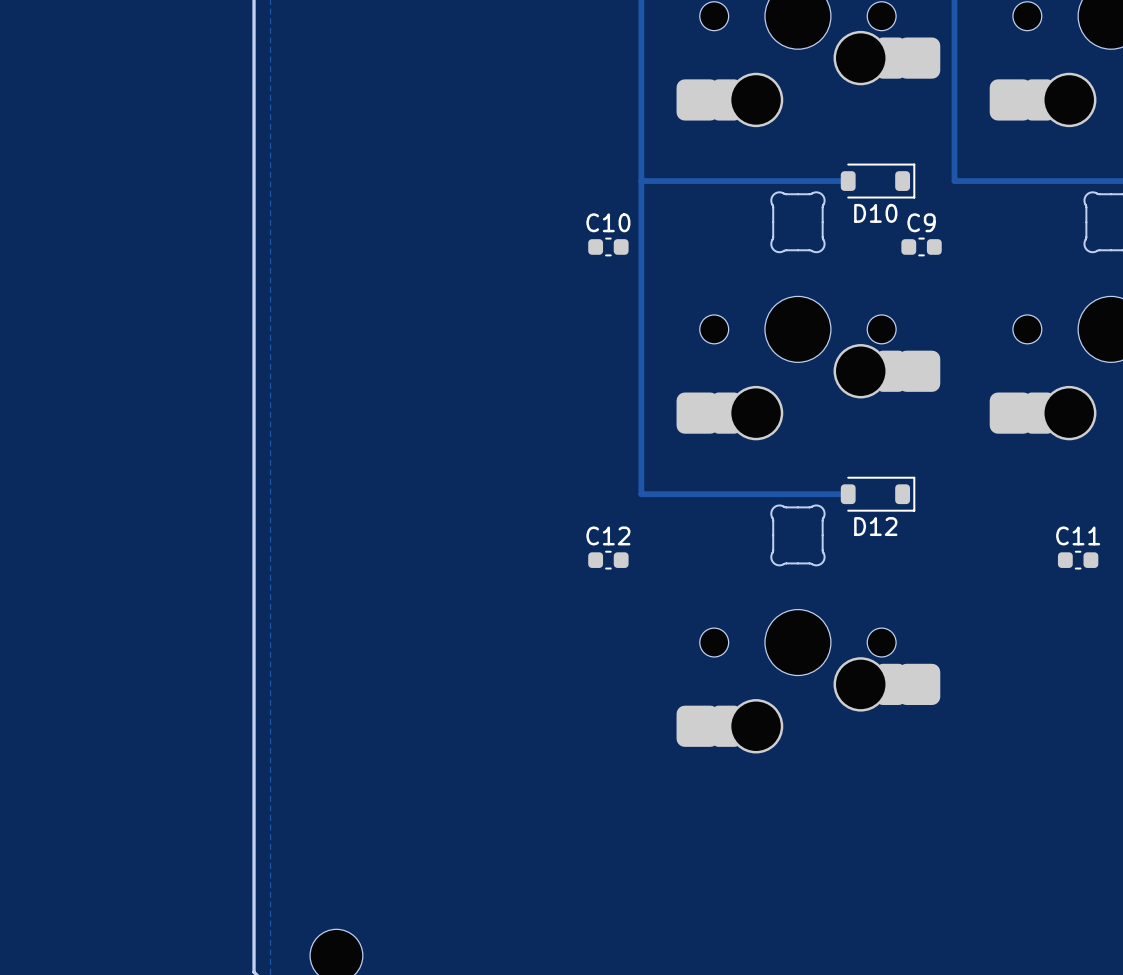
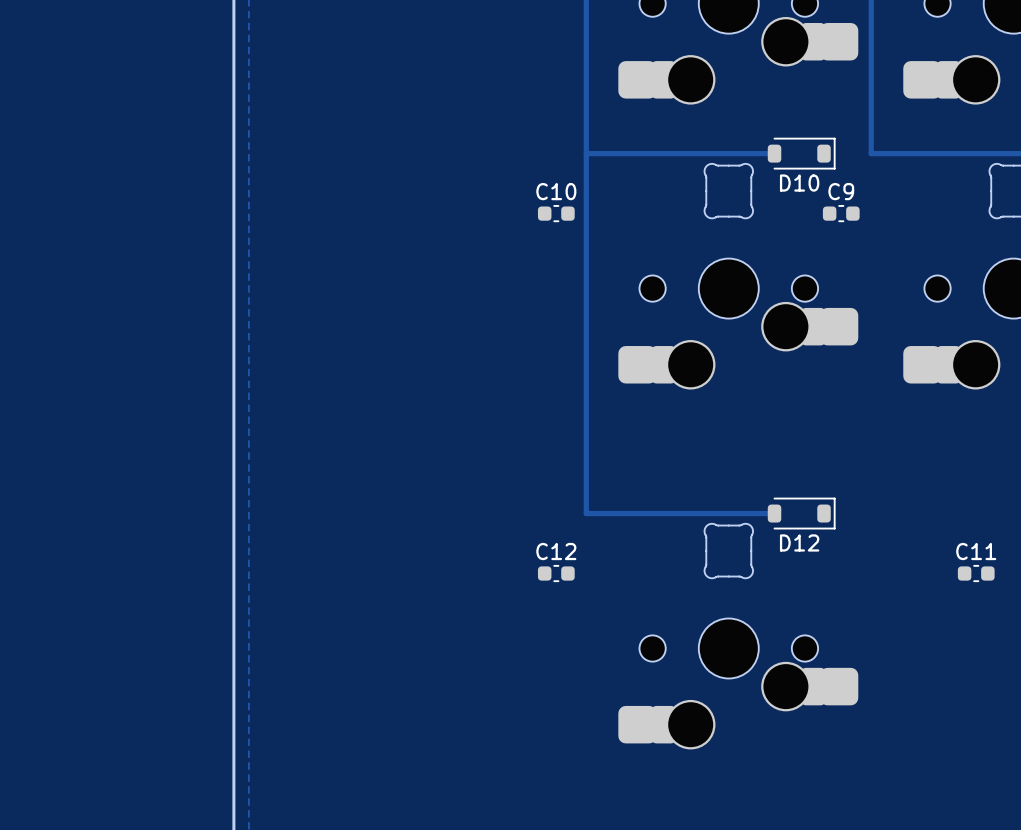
track: (848, 494) (641, 494) -> (774, 513) (586, 513) (586, 438)
D12 position: (878, 494) -> (801, 513)
part position: (797, 535) -> (728, 551)
C12 position: (608, 560) -> (556, 573)
C11 position: (1078, 560) -> (976, 573)
part position: (808, 681) -> (738, 683)

